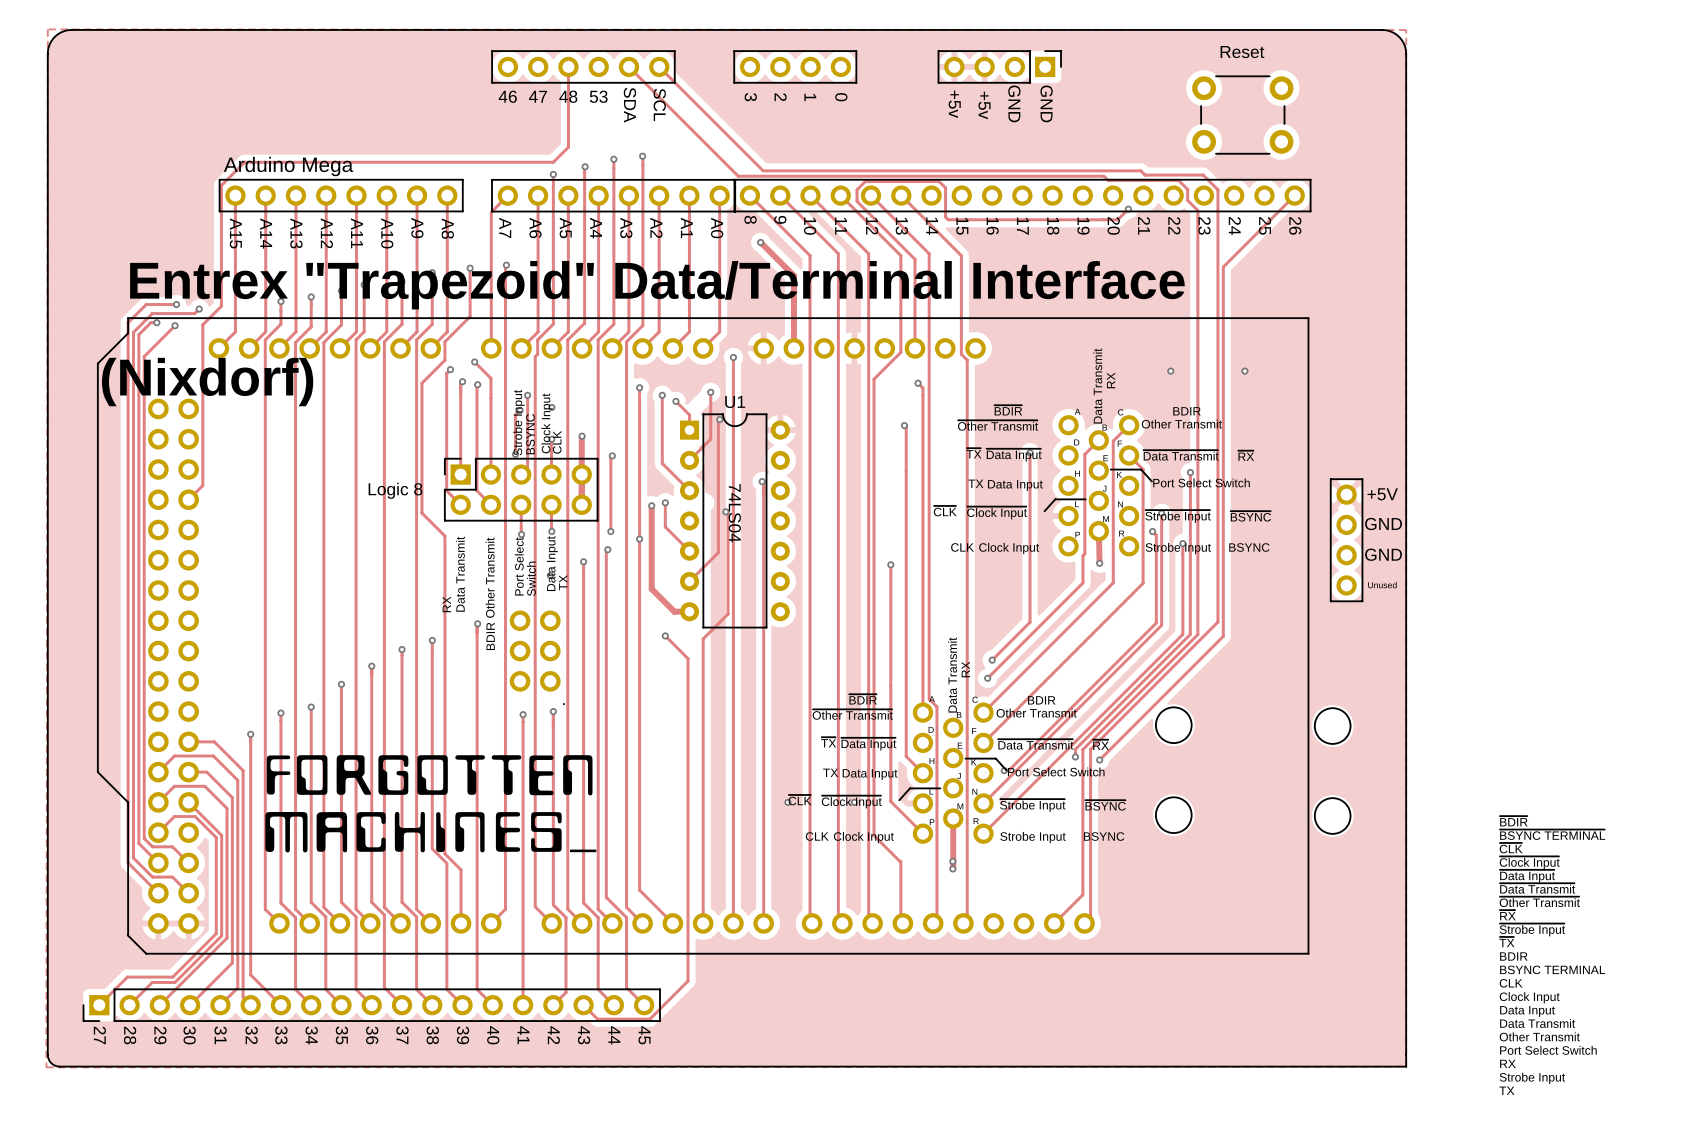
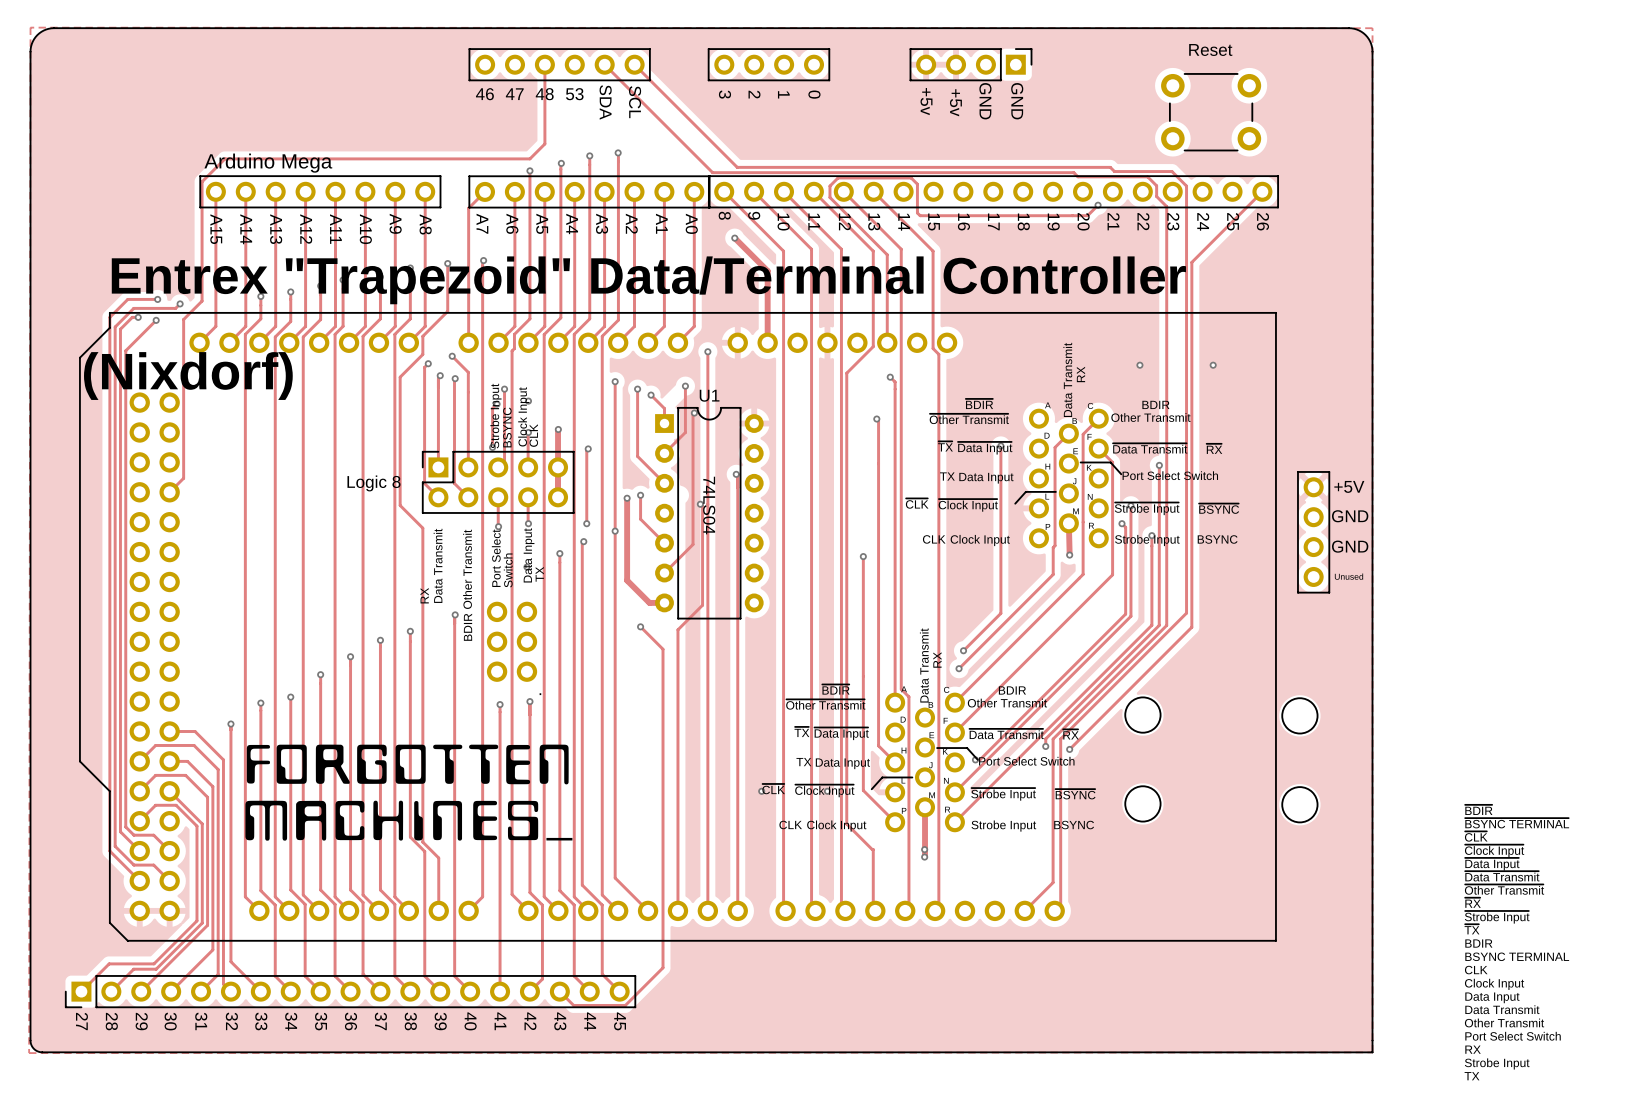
text: Entrex "Trapezoid" Data/Terminal Interface (657, 285) -> Entrex "Trapezoid" Data/Terminal Controller (648, 280)

